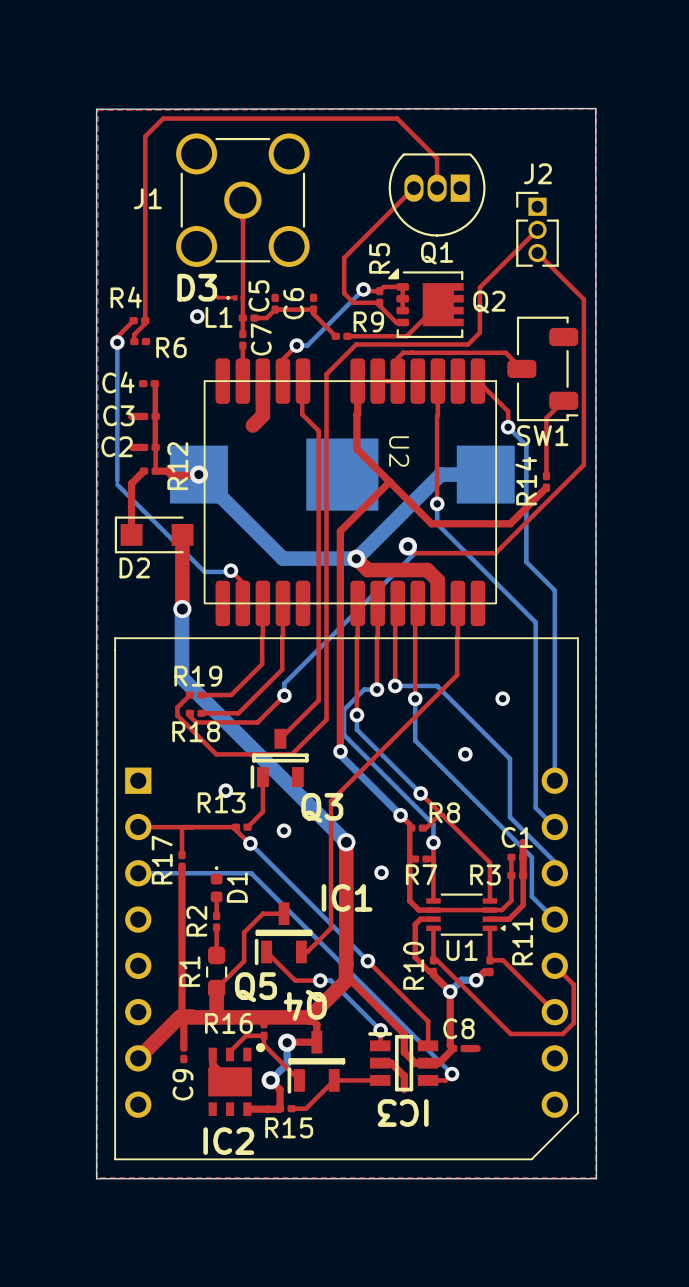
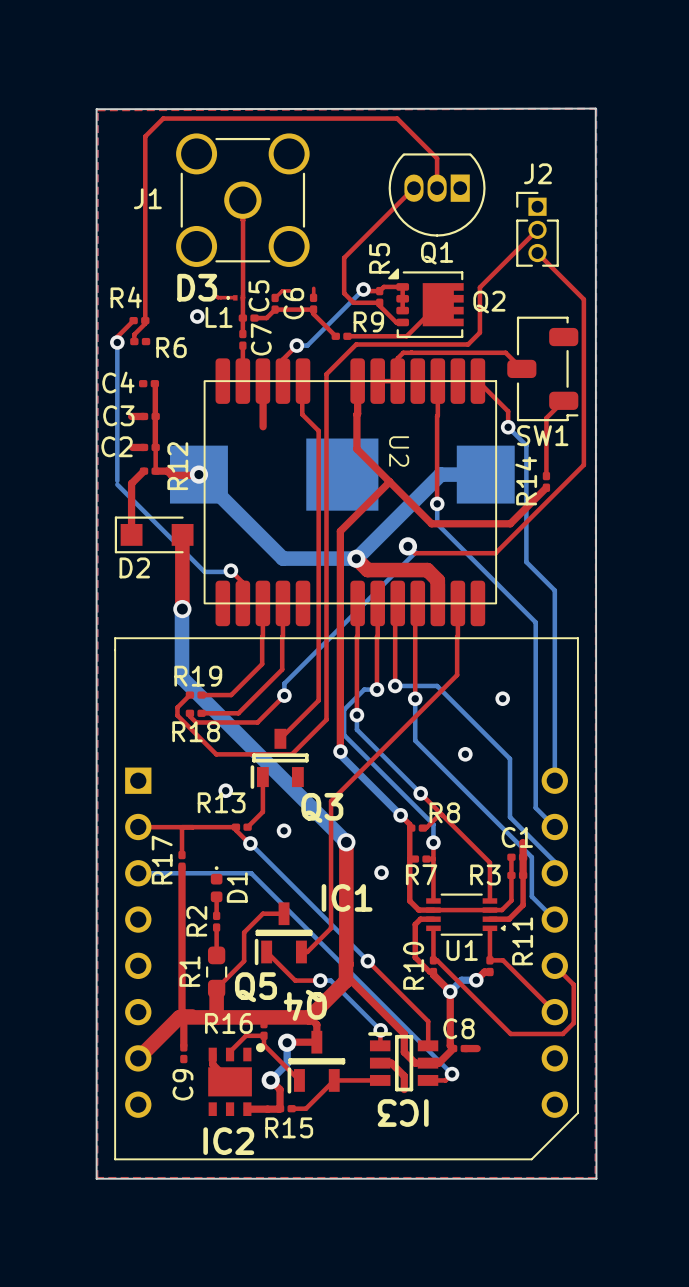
top track: none -> (313, 288) (313, 297)
top track: none -> (289, 290) (282, 290) (275, 297)
top track: (262, 381) (262, 415) (252, 425) -> none
top track: none -> (263, 382) (263, 426)

